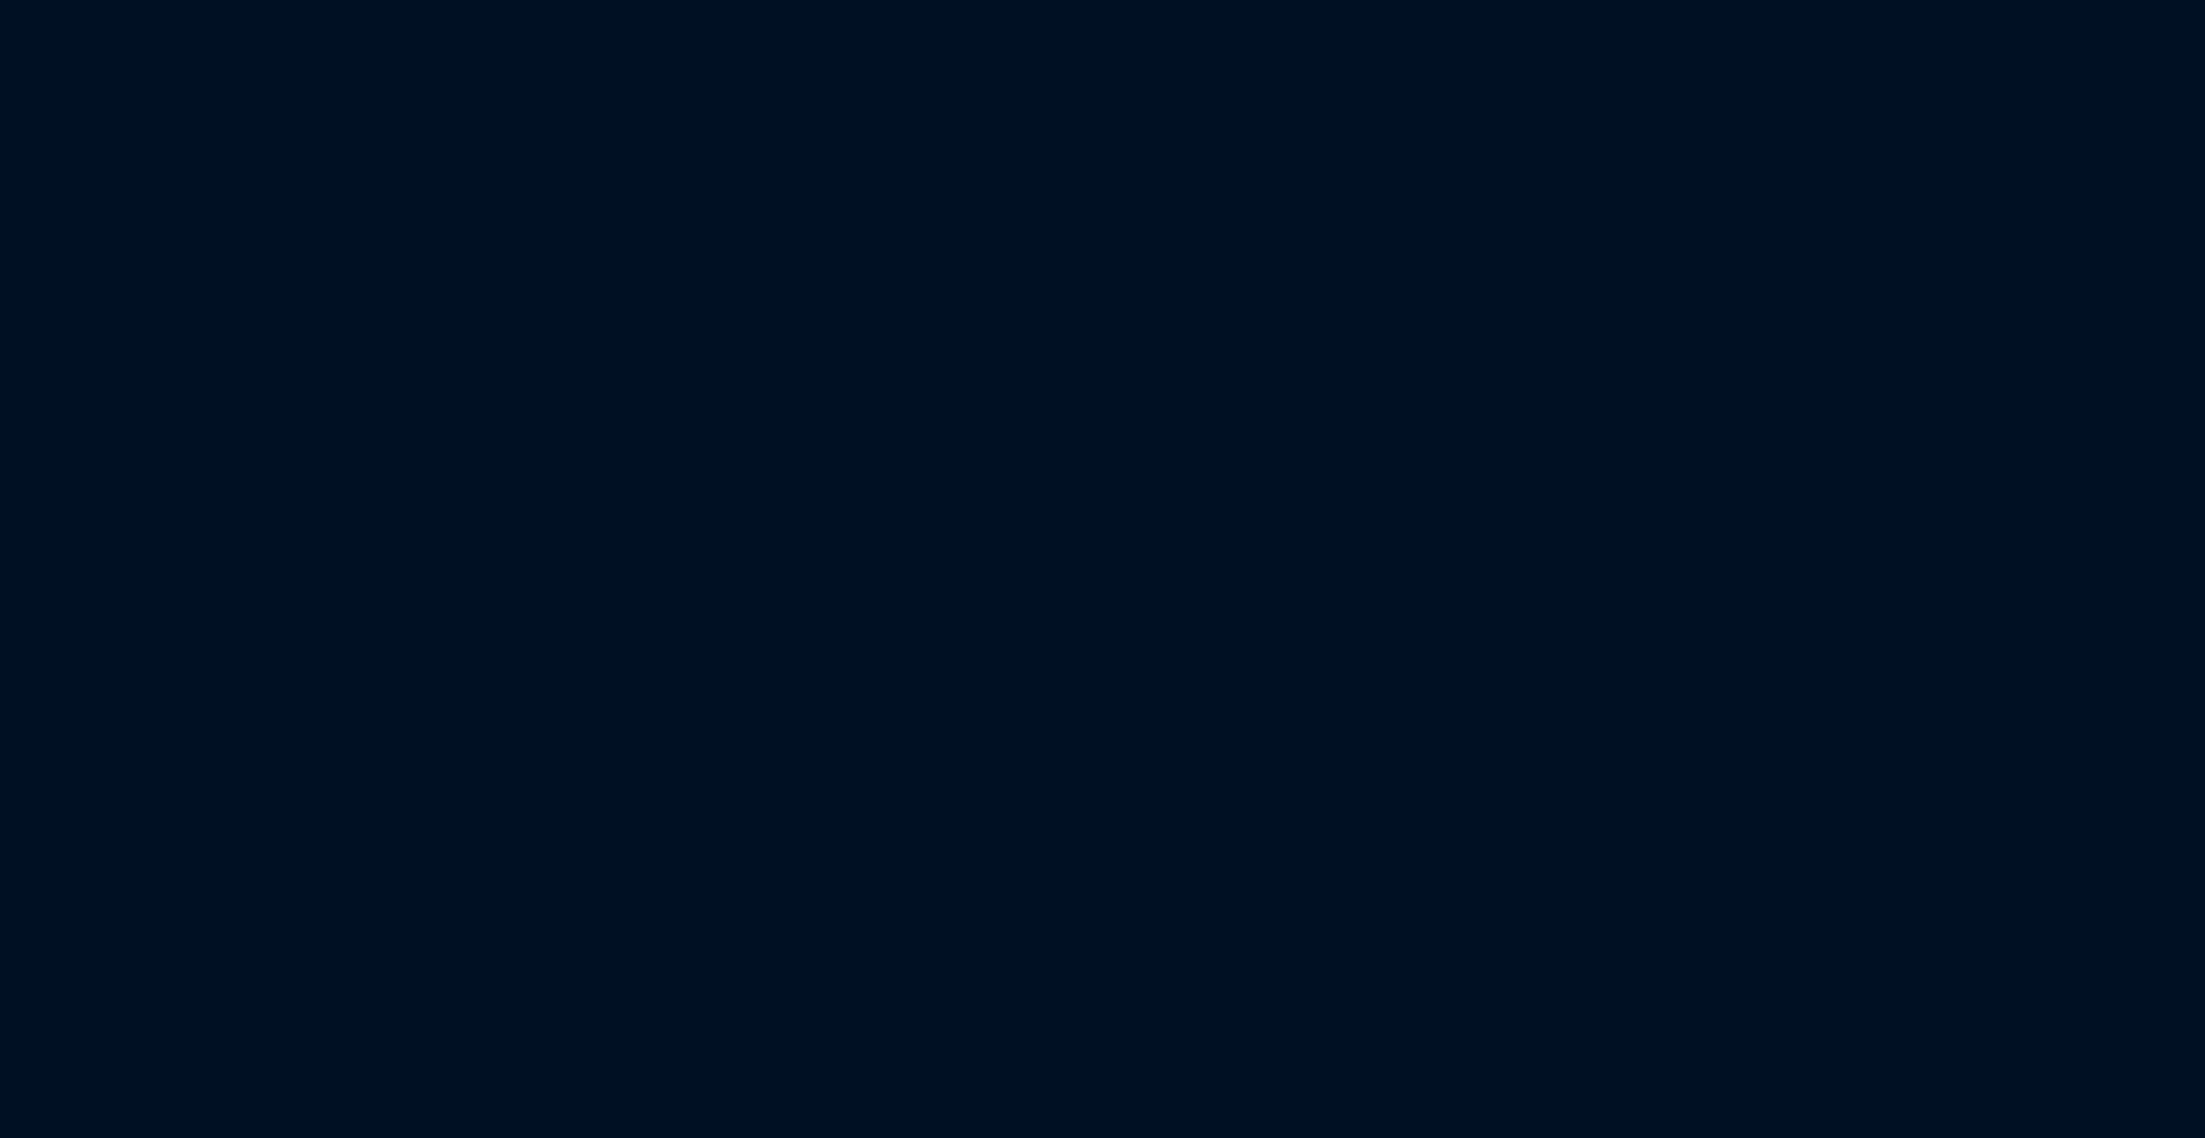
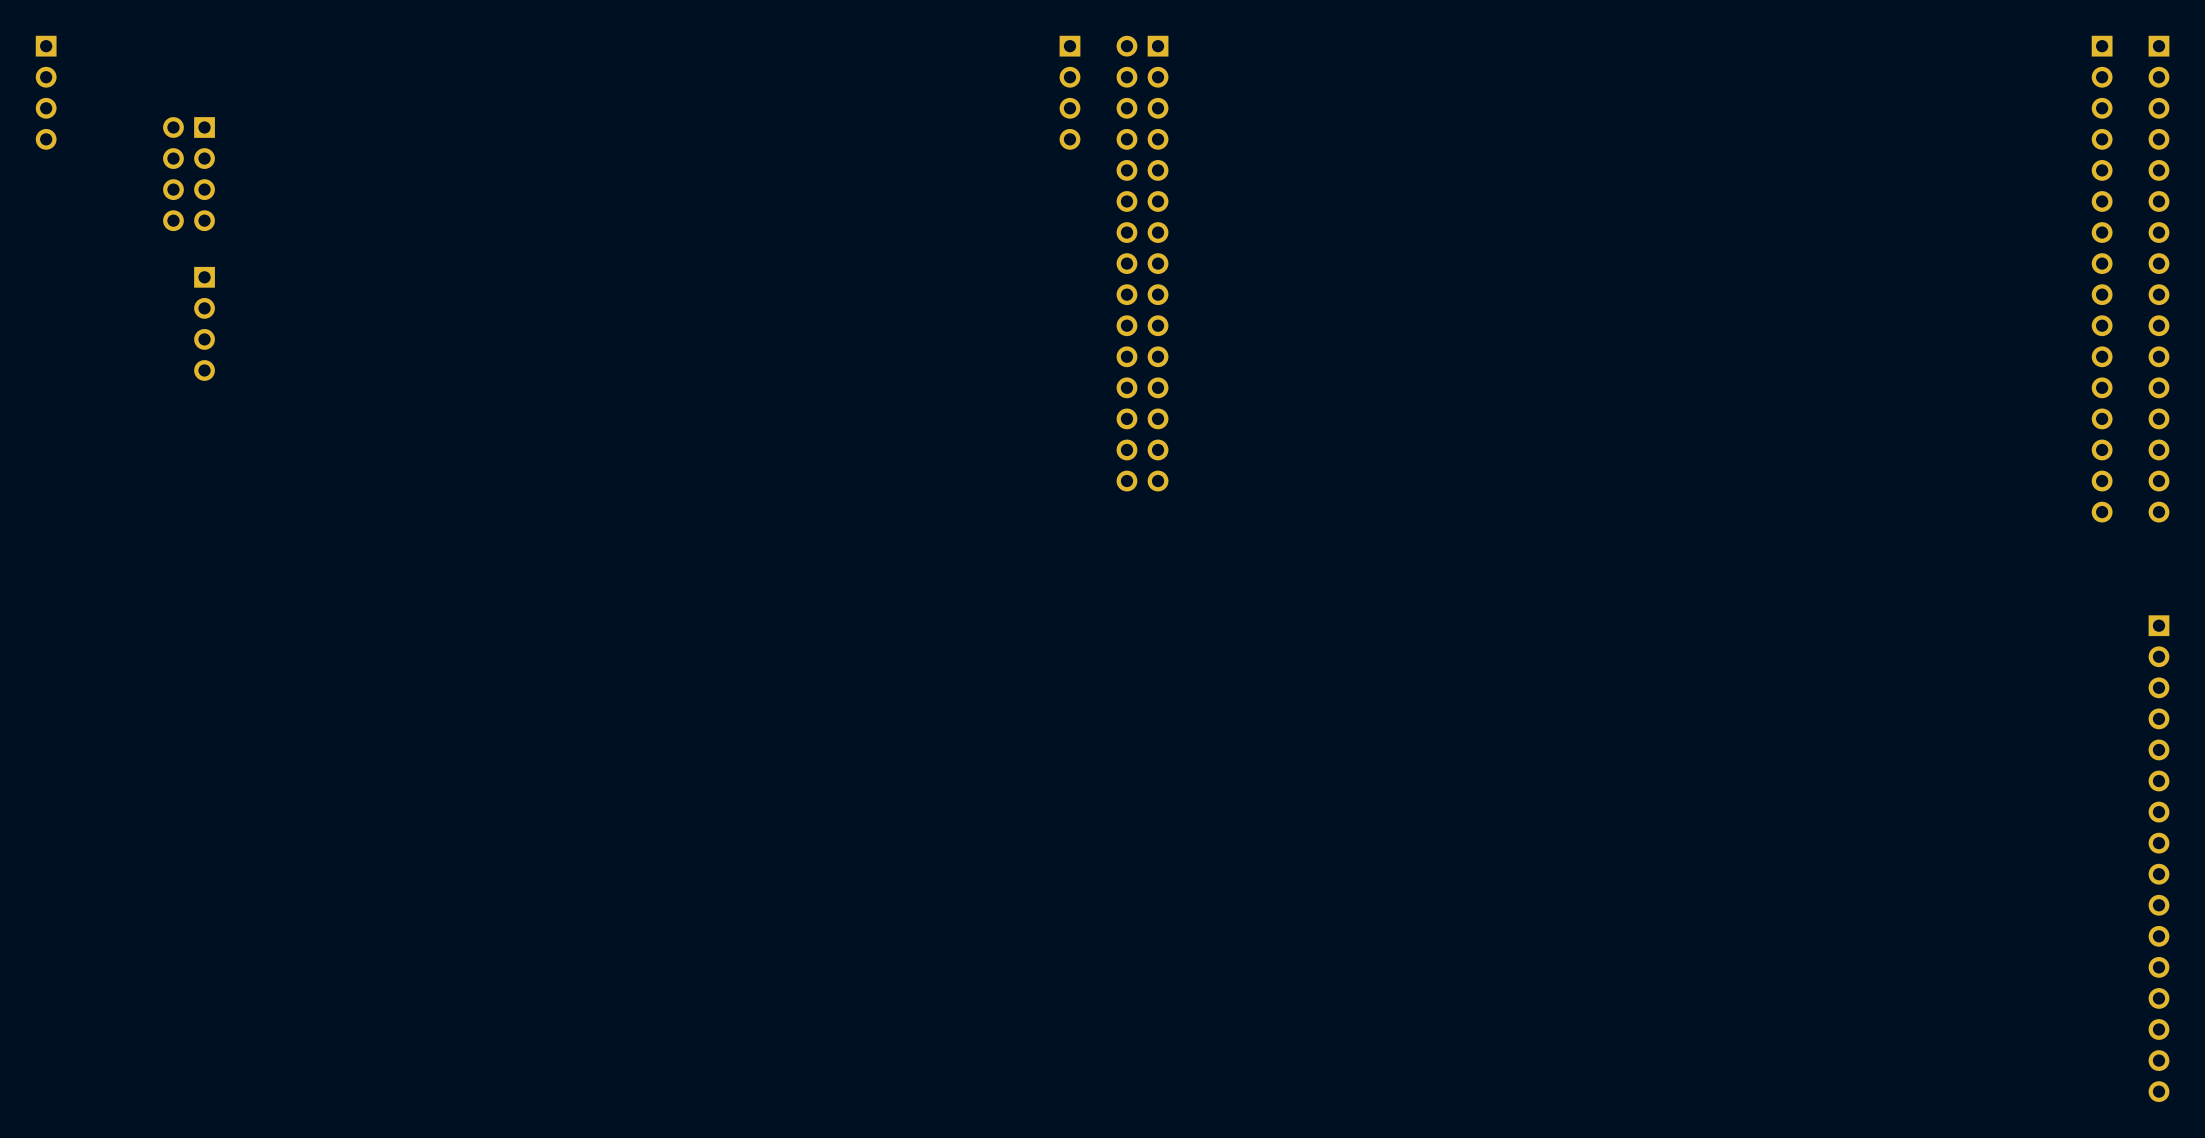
part: none -> (46, 92)
part: none -> (1069, 92)
part: none -> (189, 174)
part: none -> (1142, 263)
part: none -> (2102, 279)
part: none -> (2158, 279)
part: none -> (204, 323)
part: none -> (2158, 858)

